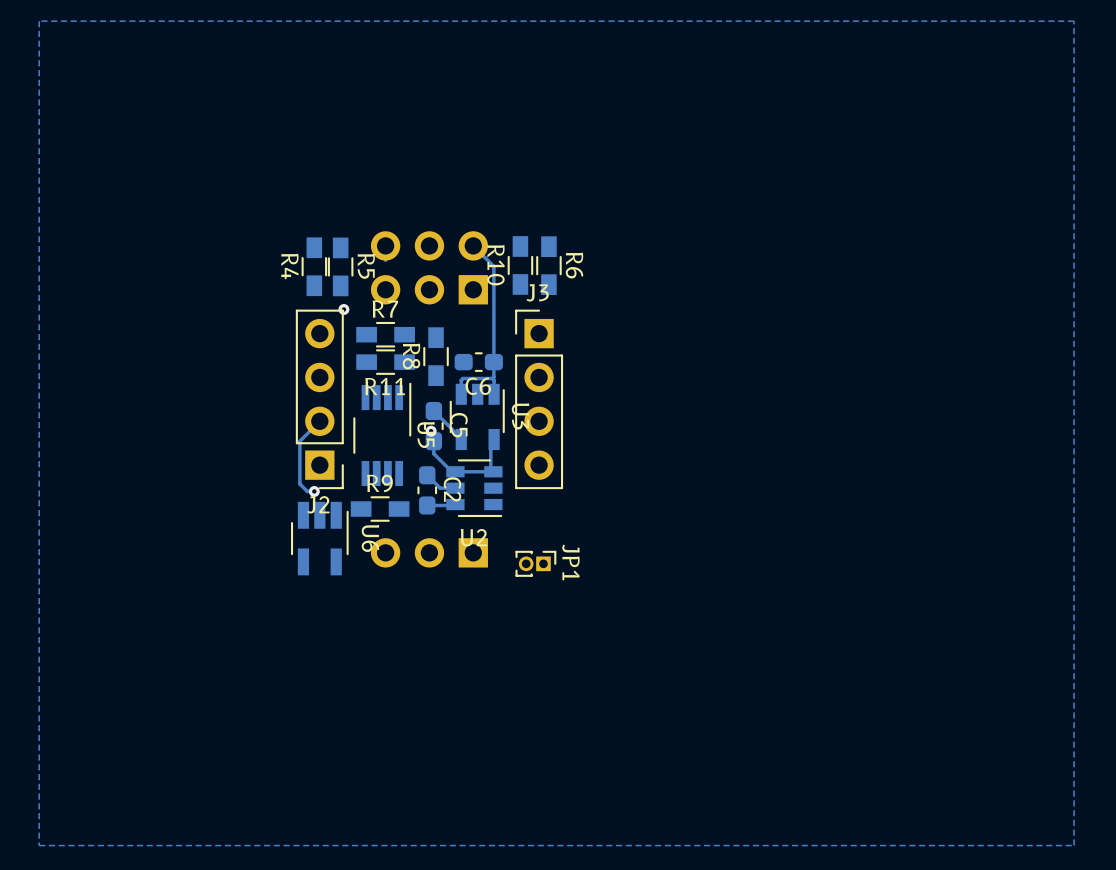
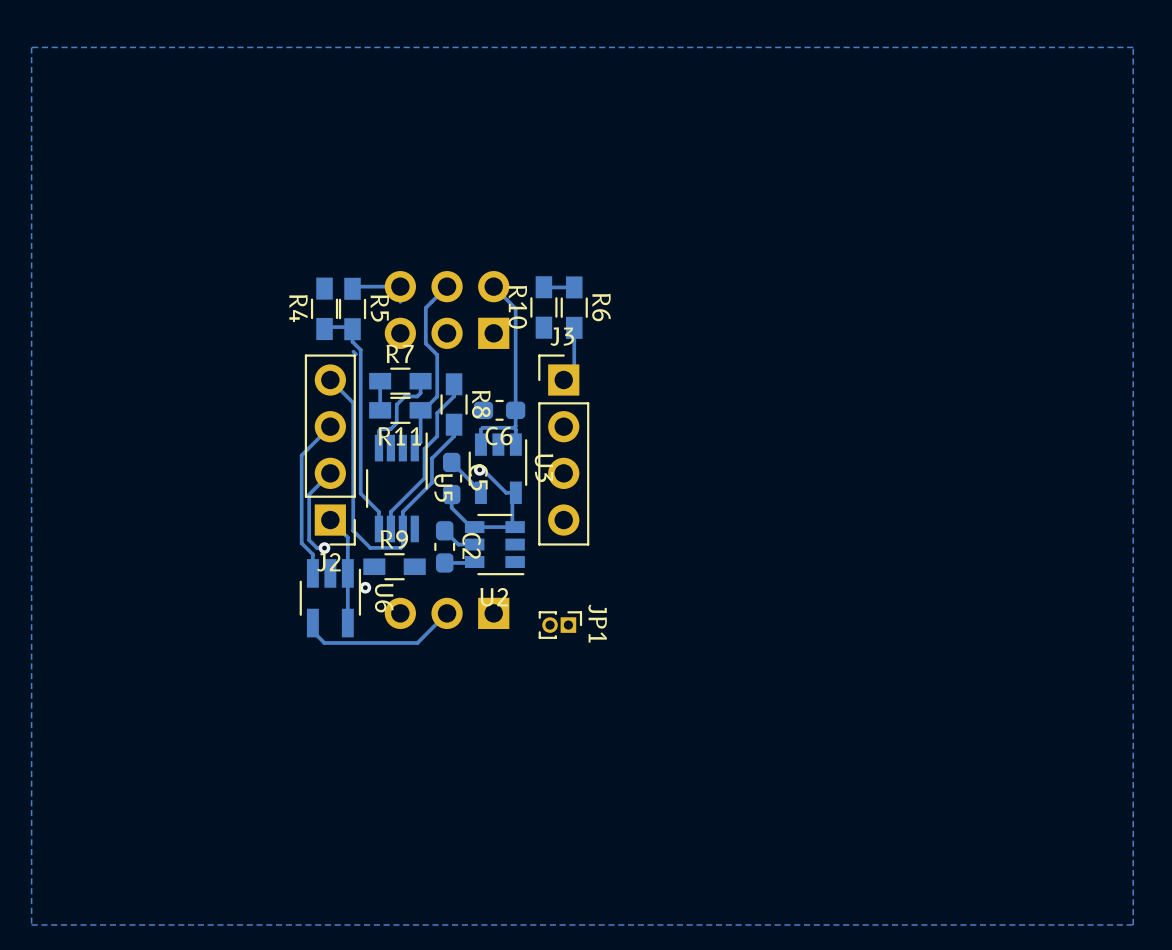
track: none -> (400, 286) (352, 286)
track: none -> (447, 286) (425, 307) (425, 343) (437, 354) (437, 396) (423, 410) (420, 410) (420, 442) (414, 448)
track: none -> (574, 287) (544, 287)
track: none -> (324, 327) (352, 327) (352, 341) (360, 350) (360, 493) (378, 511) (378, 528)
track: none -> (574, 327) (574, 369) (563, 380)
via: (343, 309) -> none
track: none -> (330, 380) (353, 402) (353, 530) (370, 547) (400, 547) (402, 546) (402, 511) (431, 482) (431, 458) (454, 436) (454, 428)
track: none -> (380, 381) (380, 410)
track: none -> (420, 381) (420, 393) (417, 396) (405, 396) (396, 404) (396, 423) (390, 429) (380, 429) (378, 431) (378, 448)
track: none -> (454, 384) (454, 396) (437, 413) (437, 436) (424, 448) (424, 478) (390, 511) (390, 528)
R8 name position: R8 (411, 356) -> R8 (481, 404)
track: none -> (330, 426) (301, 455) (301, 543) (312, 554) (312, 573)
track: none -> (479, 469) (483, 469) (506, 492) (515, 492)
via position: (431, 431) -> (479, 469)
track: none -> (330, 520) (347, 537) (347, 623)
via: none -> (365, 587)
track: none -> (447, 613) (417, 642) (324, 642) (312, 631) (312, 623)

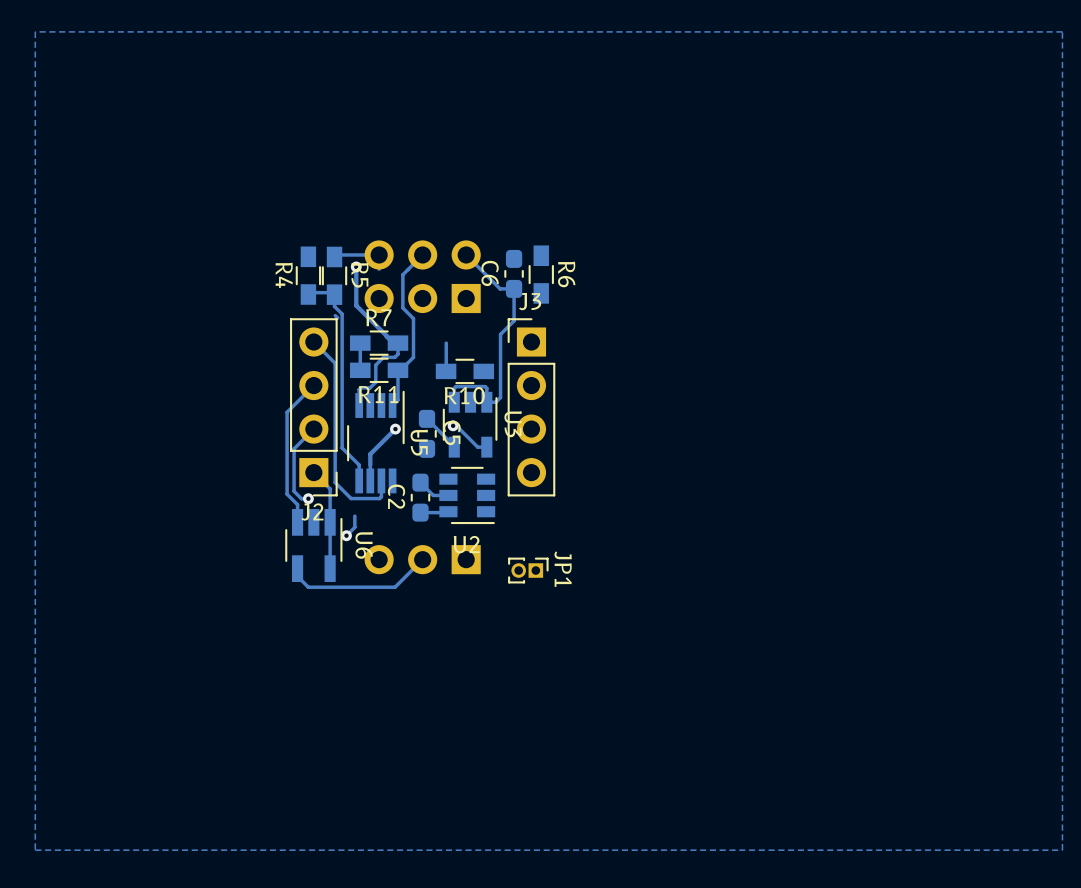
track: (574, 287) (544, 287) -> none
track: none -> (356, 266) (356, 305) (393, 343) (397, 343)
via: none -> (356, 266)
R10 name position: R10 (517, 307) -> R10 (464, 395)
R10 rotation: 0° (543, 307) -> 90° clockwise (464, 371)
R10 position: (543, 307) -> (464, 371)
track: (515, 308) (515, 426) (513, 427) -> (486, 275) (500, 288) (514, 288) (514, 320) (500, 334) (500, 397) (495, 402) (486, 402)
track: (574, 327) (574, 369) (563, 380) -> none
track: none -> (446, 343) (446, 371)
track: (454, 384) (454, 396) (437, 413) (437, 436) (424, 448) (424, 478) (390, 511) -> (395, 429) (370, 454) (370, 465)
R8: (454, 404) -> none
C6 rotation: 0° (499, 410) -> 90° clockwise (514, 273)
C6 position: (499, 410) -> (514, 273)
track: (454, 424) (454, 436) (431, 458) (431, 482) (402, 511) (402, 528) -> none
via: none -> (395, 429)
track: (512, 489) (512, 524) (515, 527) (470, 527) (451, 507) (451, 494) -> none
C2 name position: C2 (471, 545) -> C2 (396, 496)
track: none -> (354, 516) (354, 527) (346, 535)
R9: (394, 566) -> none

